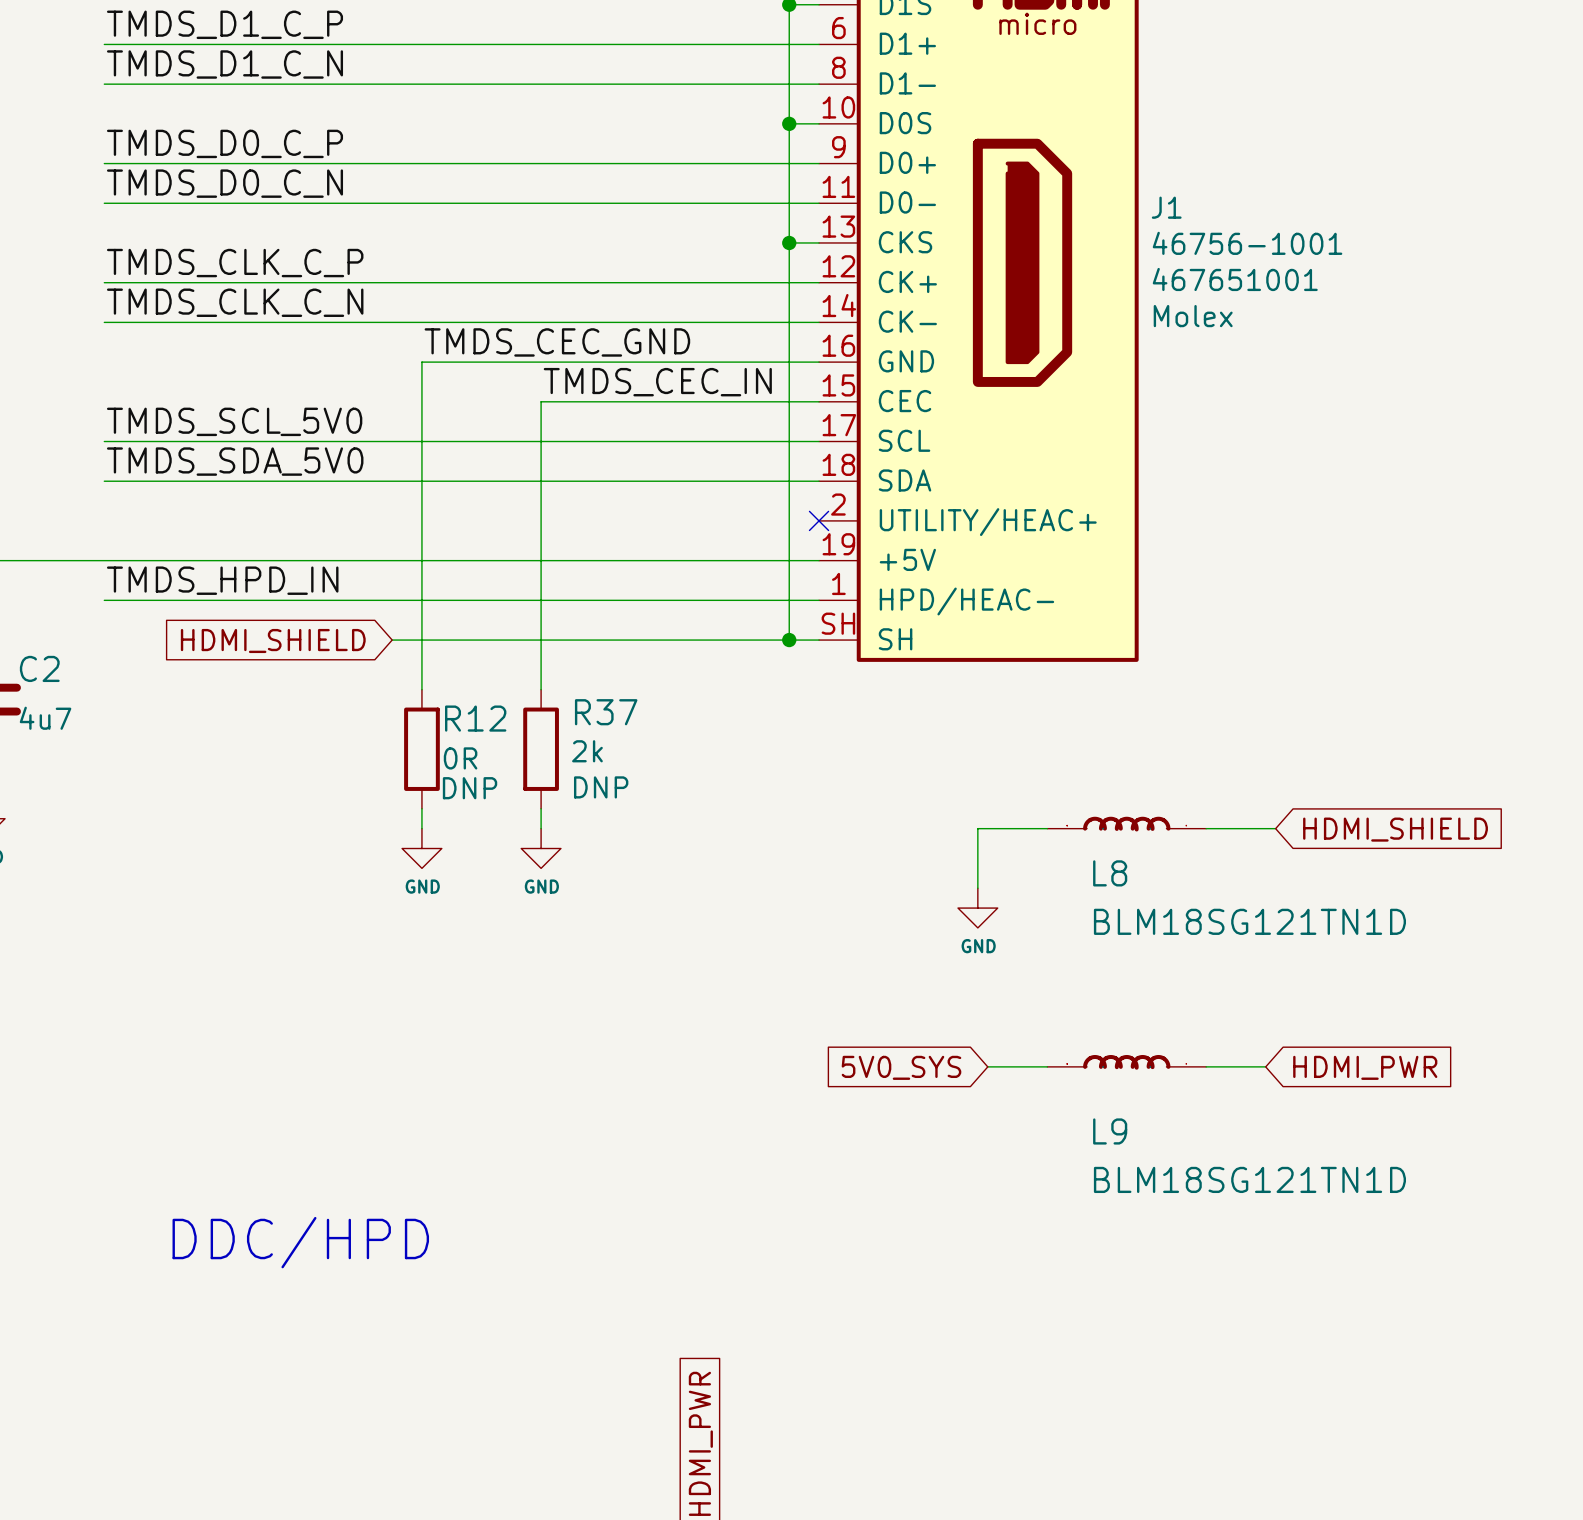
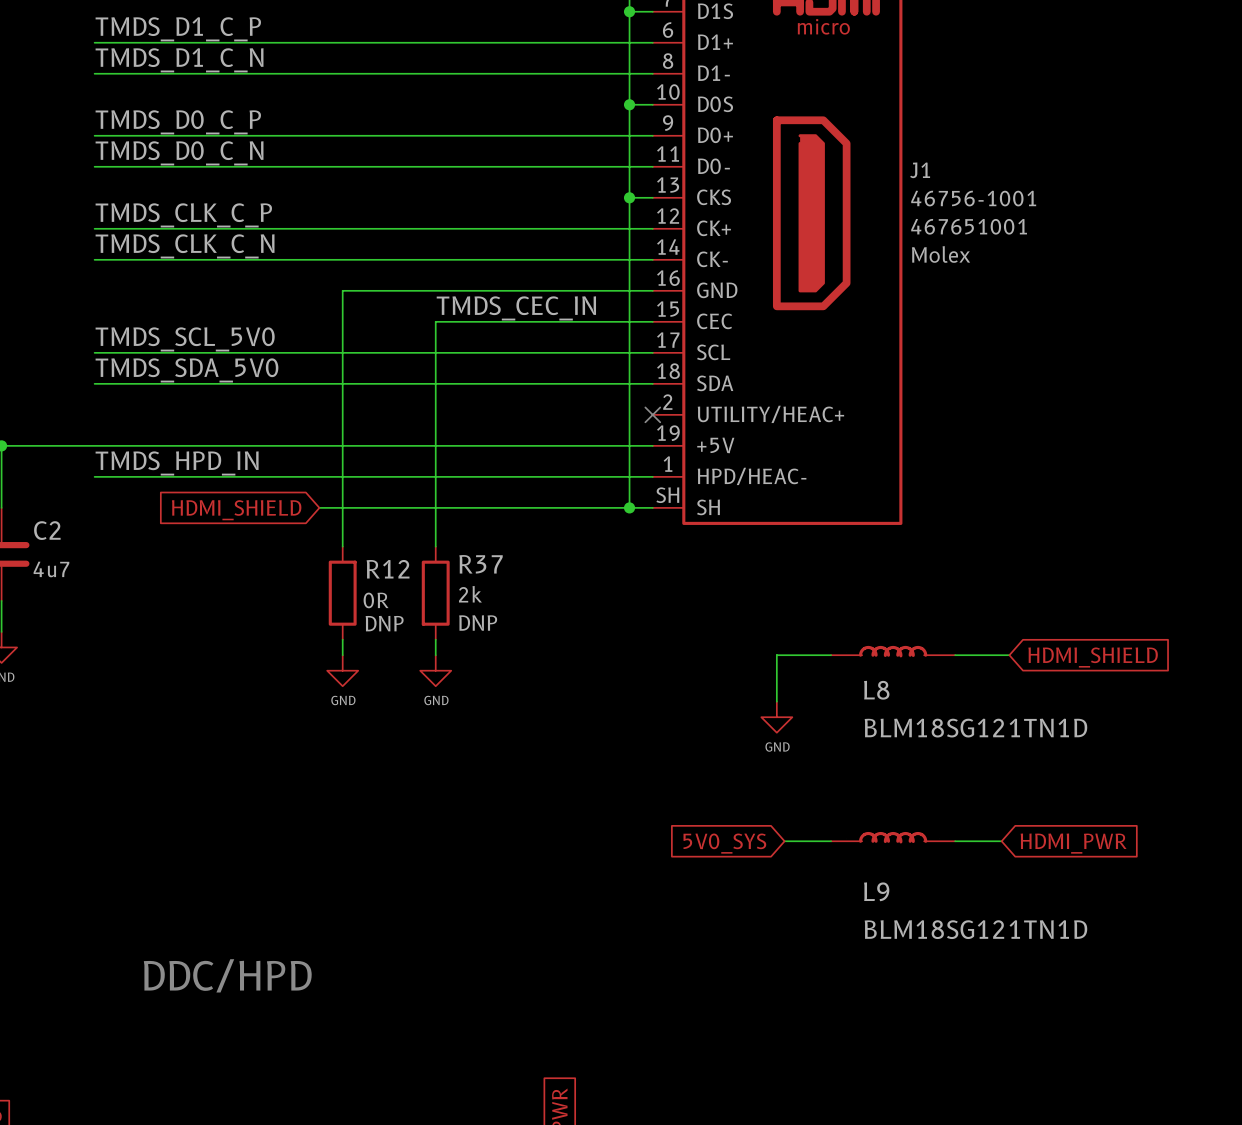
label: TMDS_CEC_GND (557, 342) -> none

